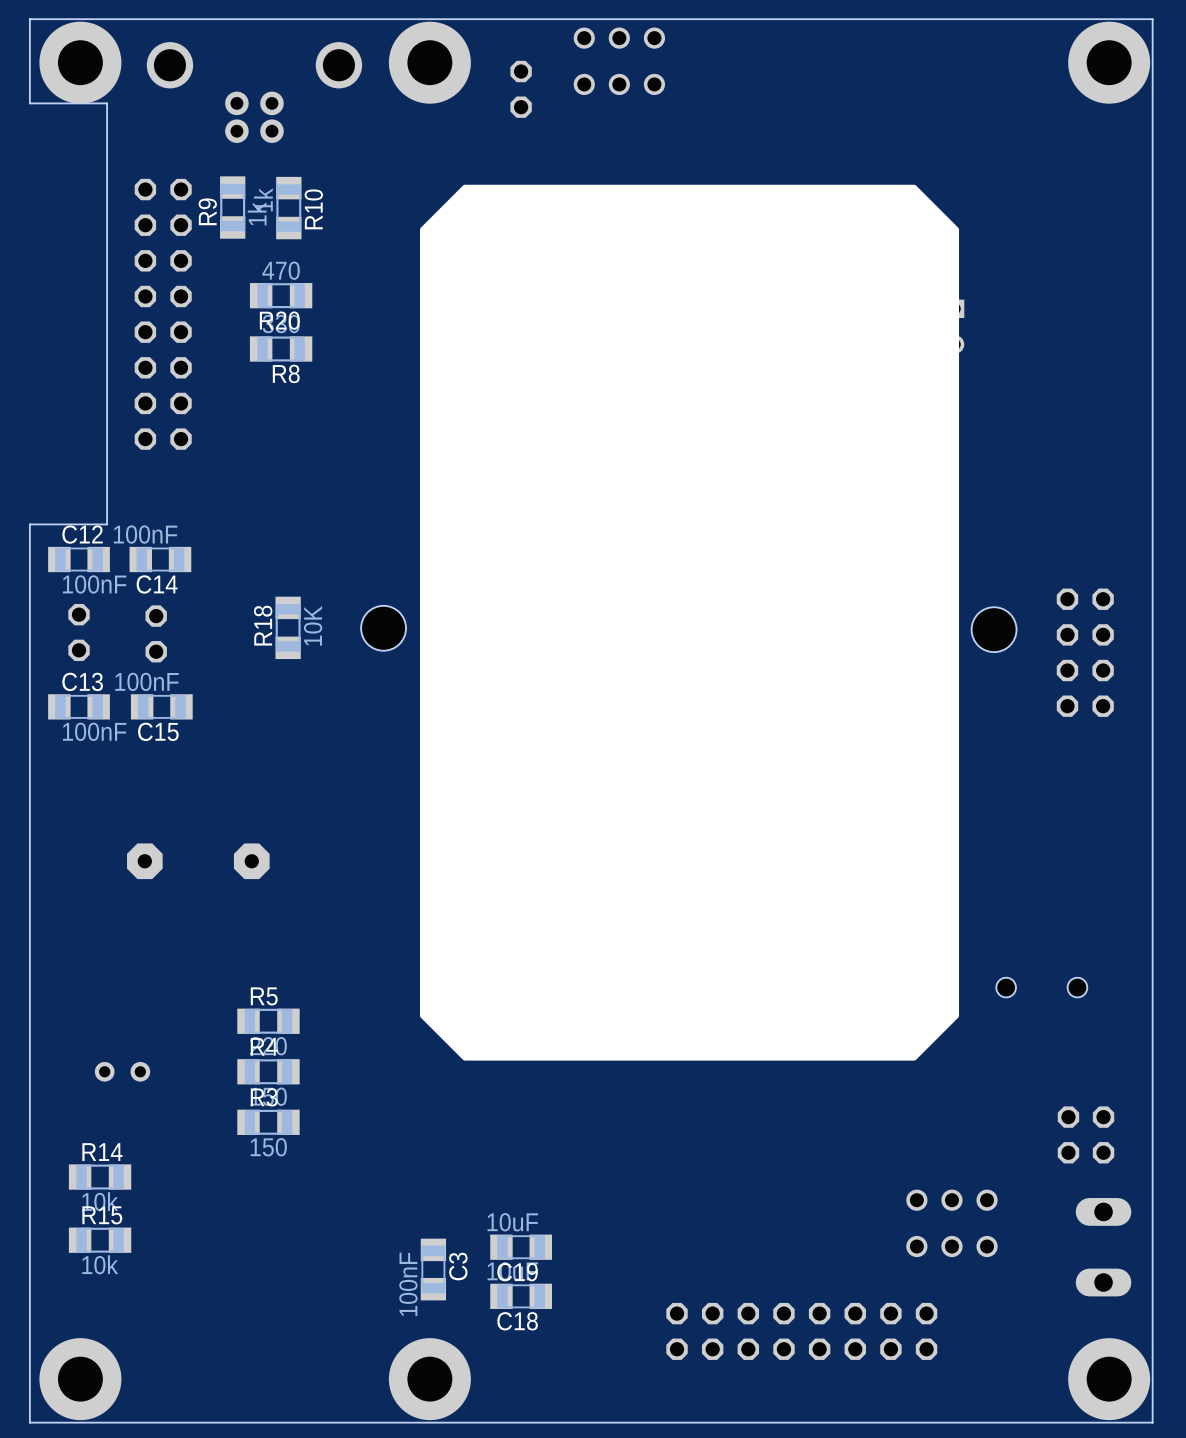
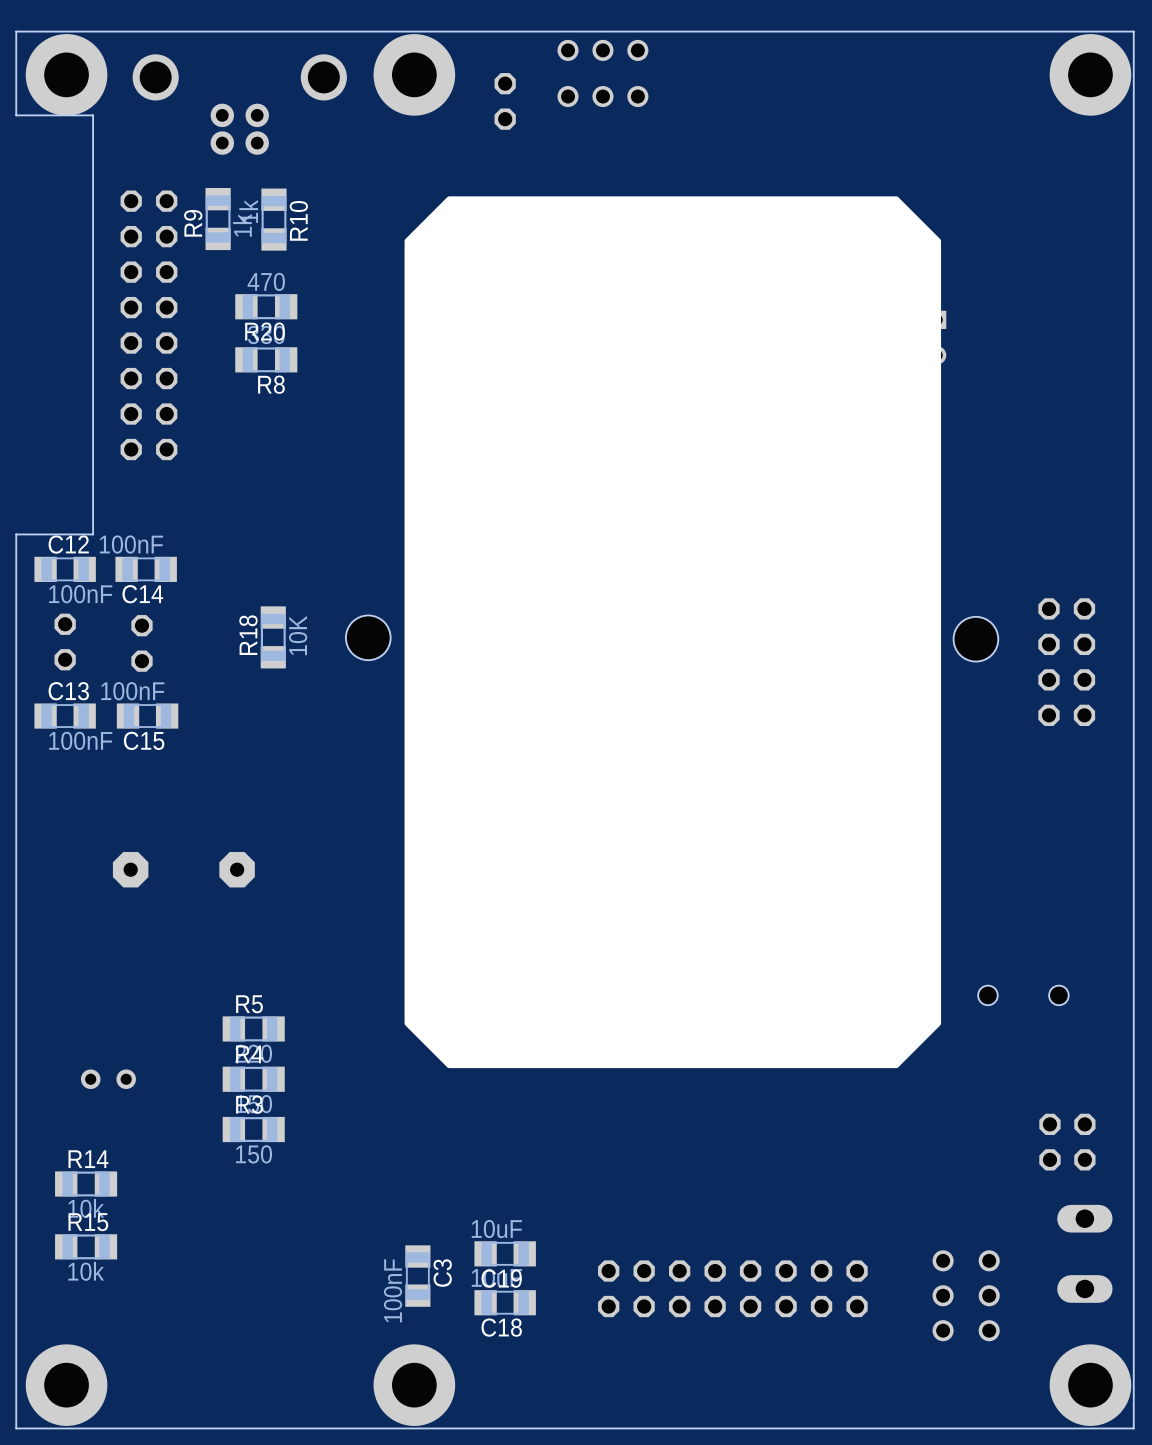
part rotation: 0° (951, 1223) -> 90° clockwise (966, 1295)
part position: (951, 1223) -> (966, 1295)
part position: (801, 1331) -> (732, 1288)

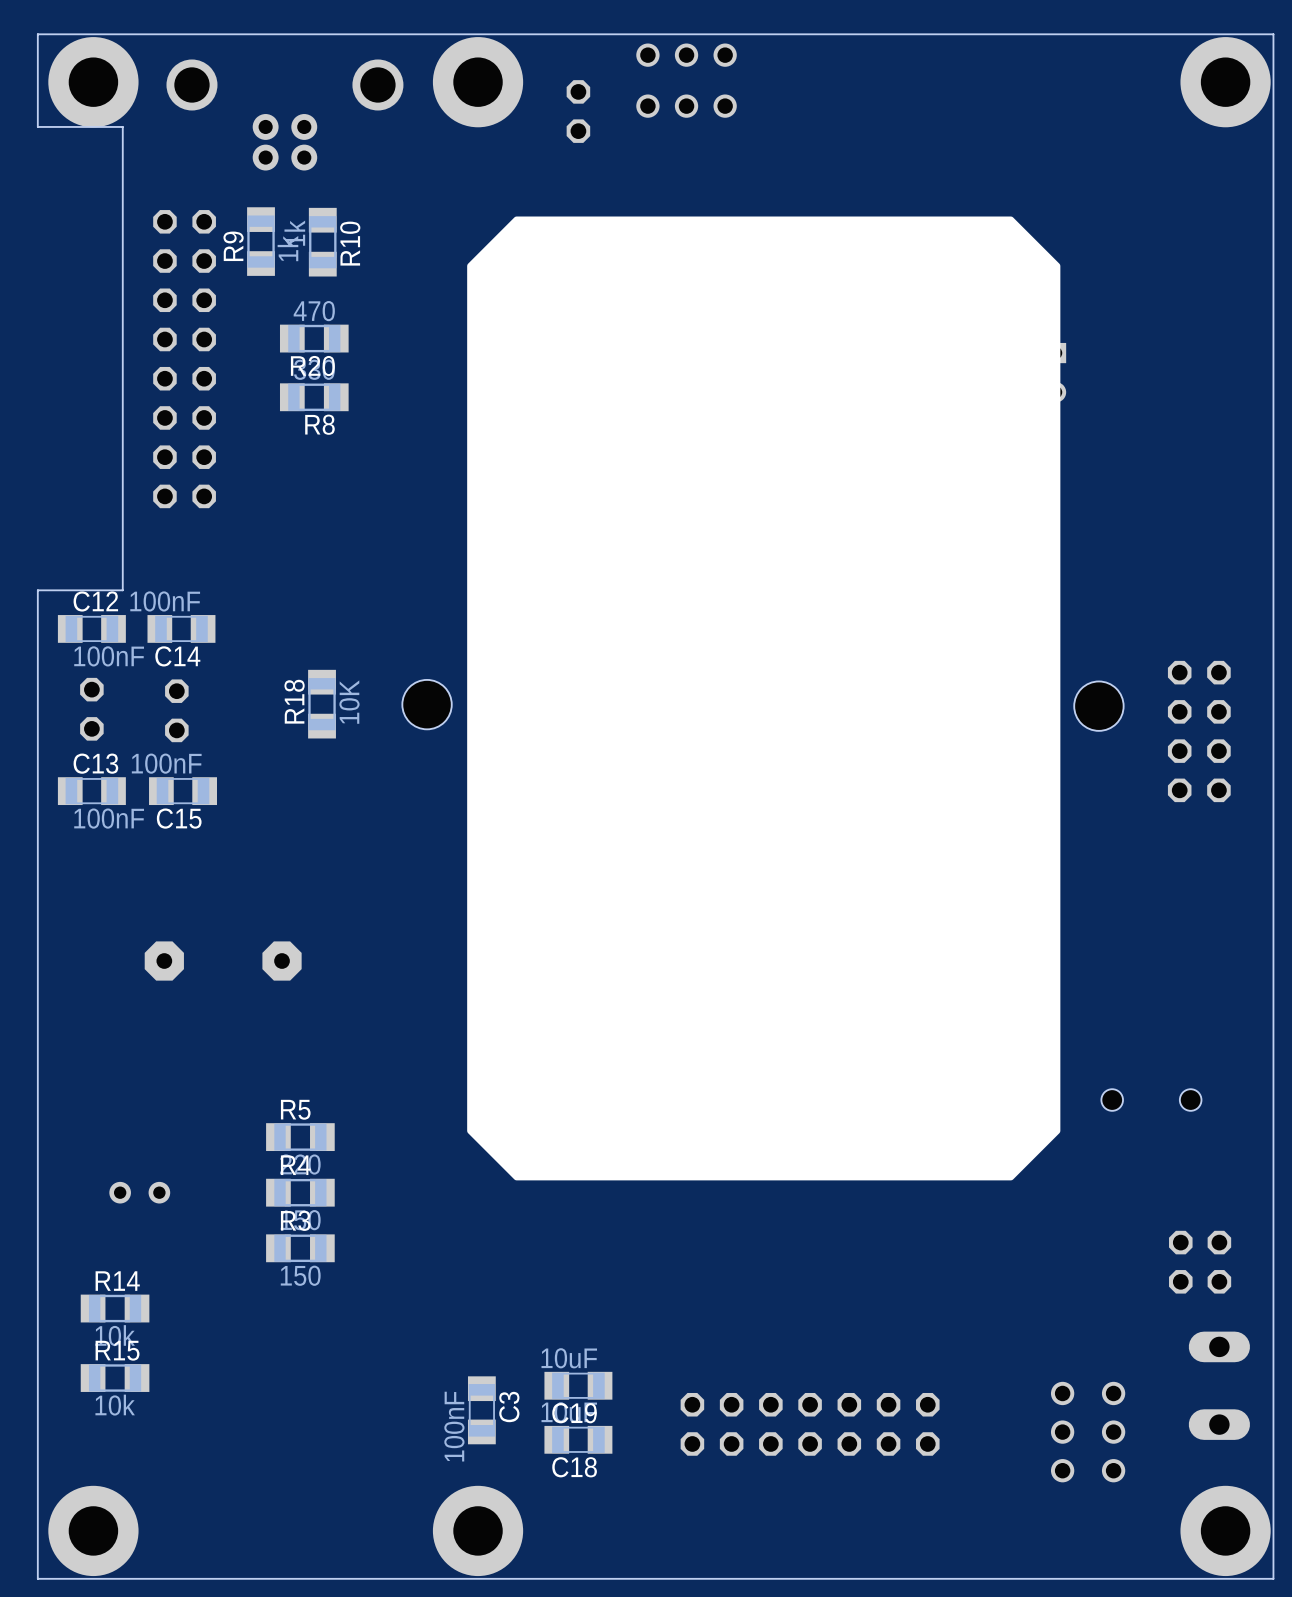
part: none -> (810, 1424)
part: (732, 1288) -> none

